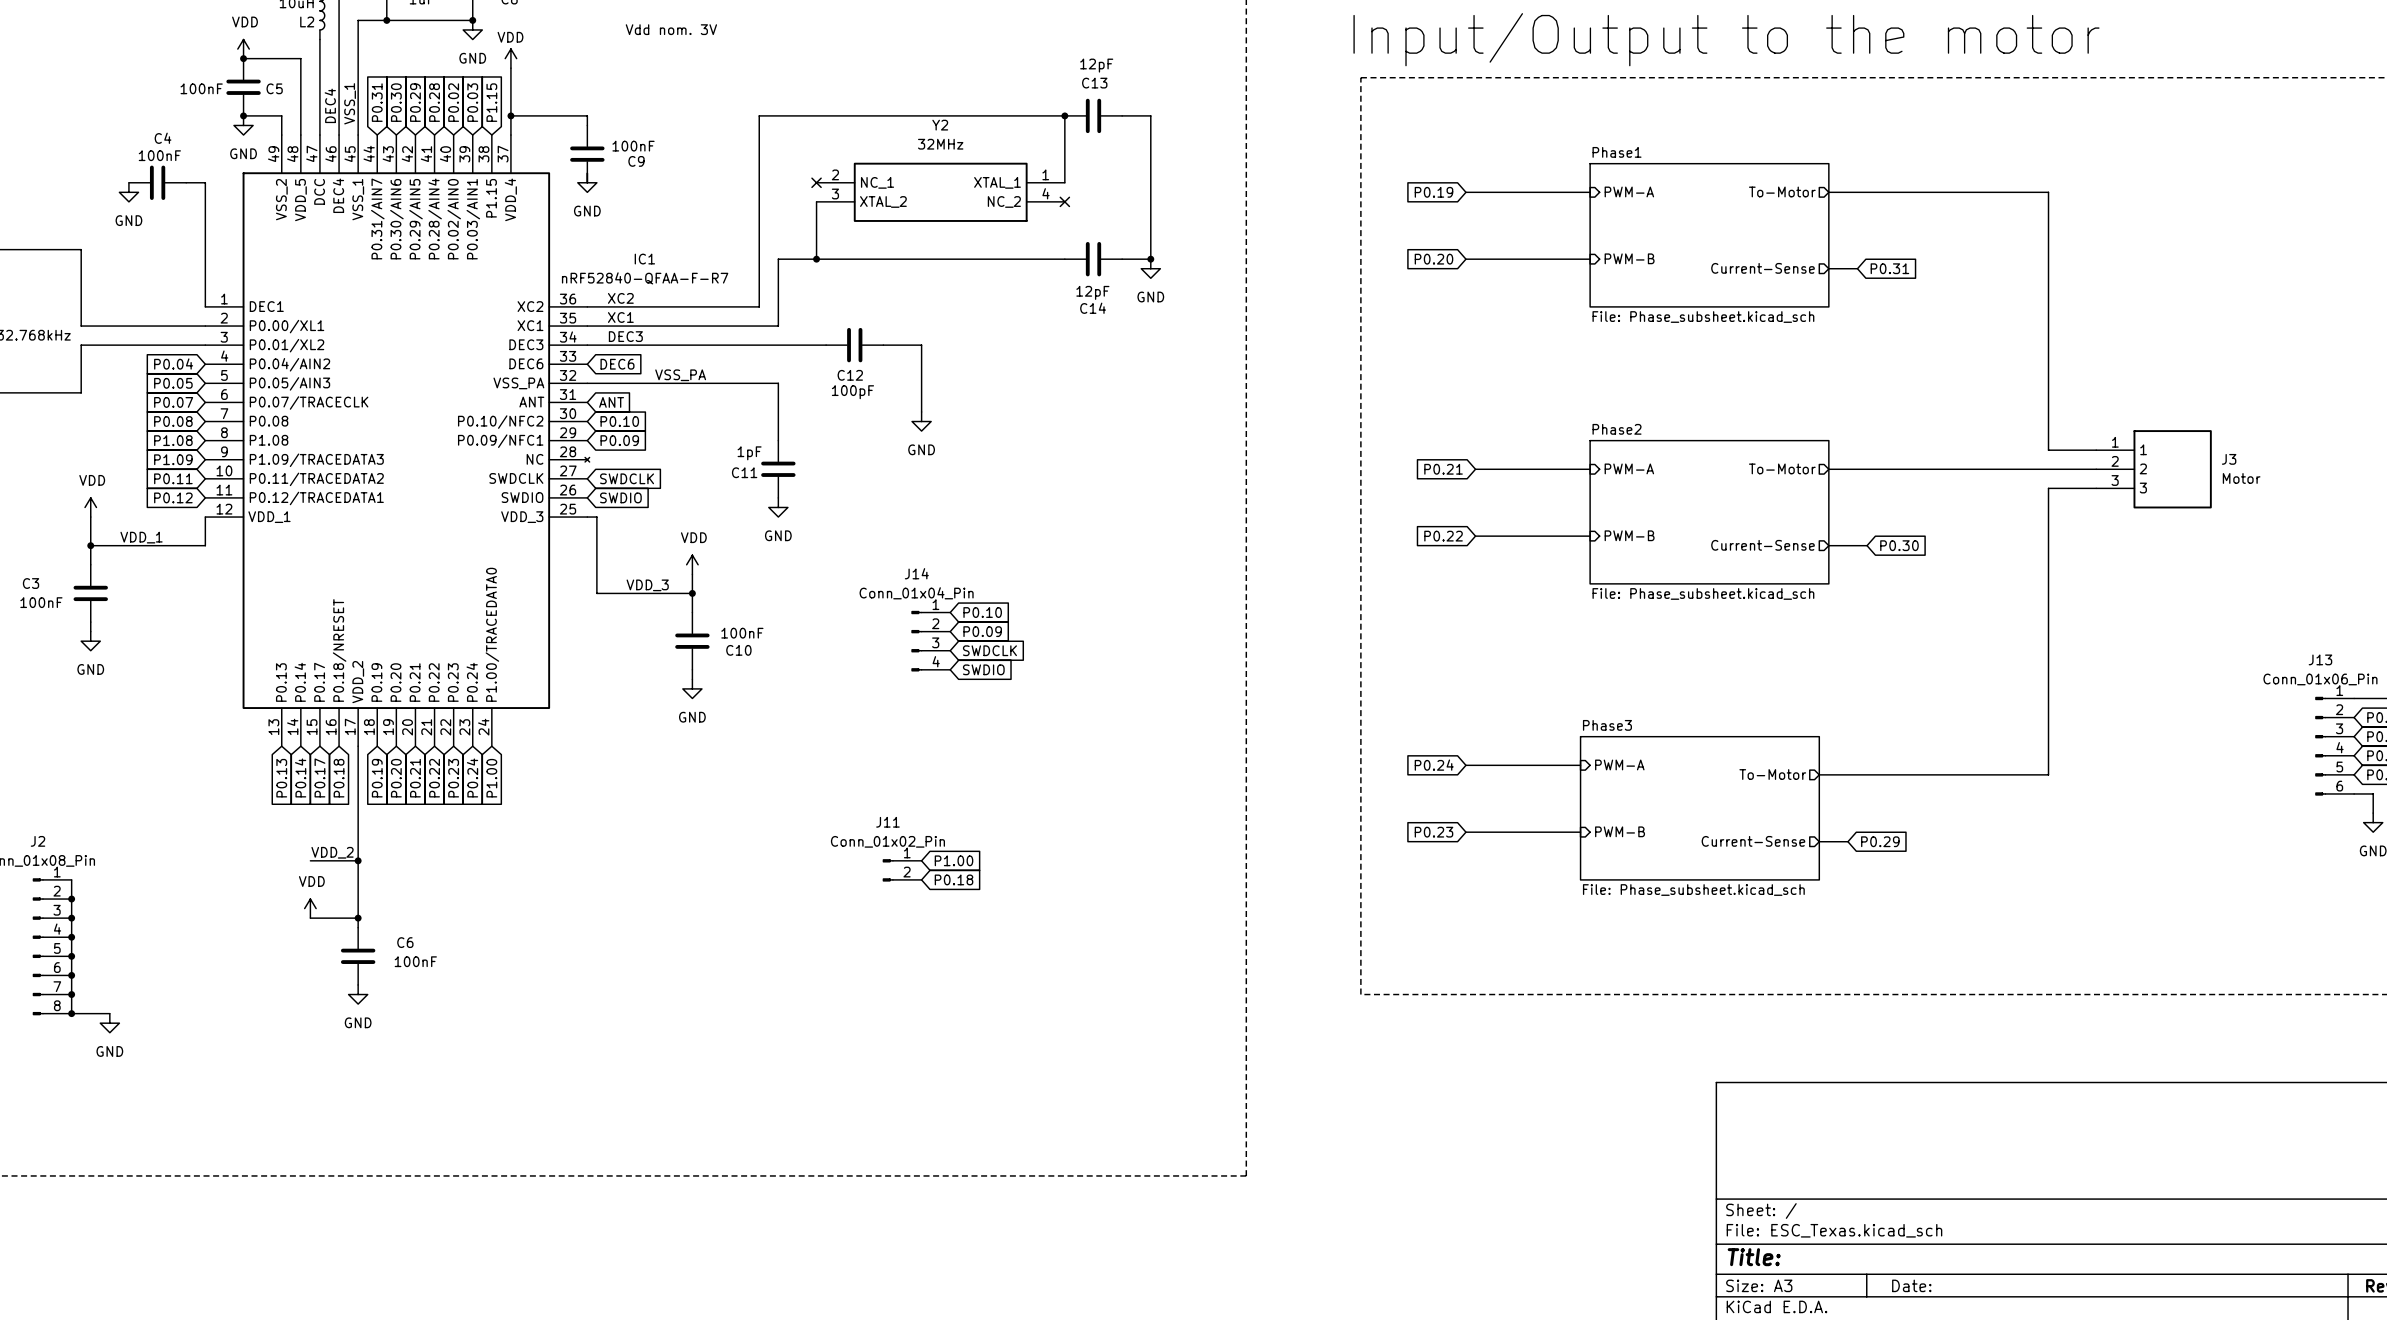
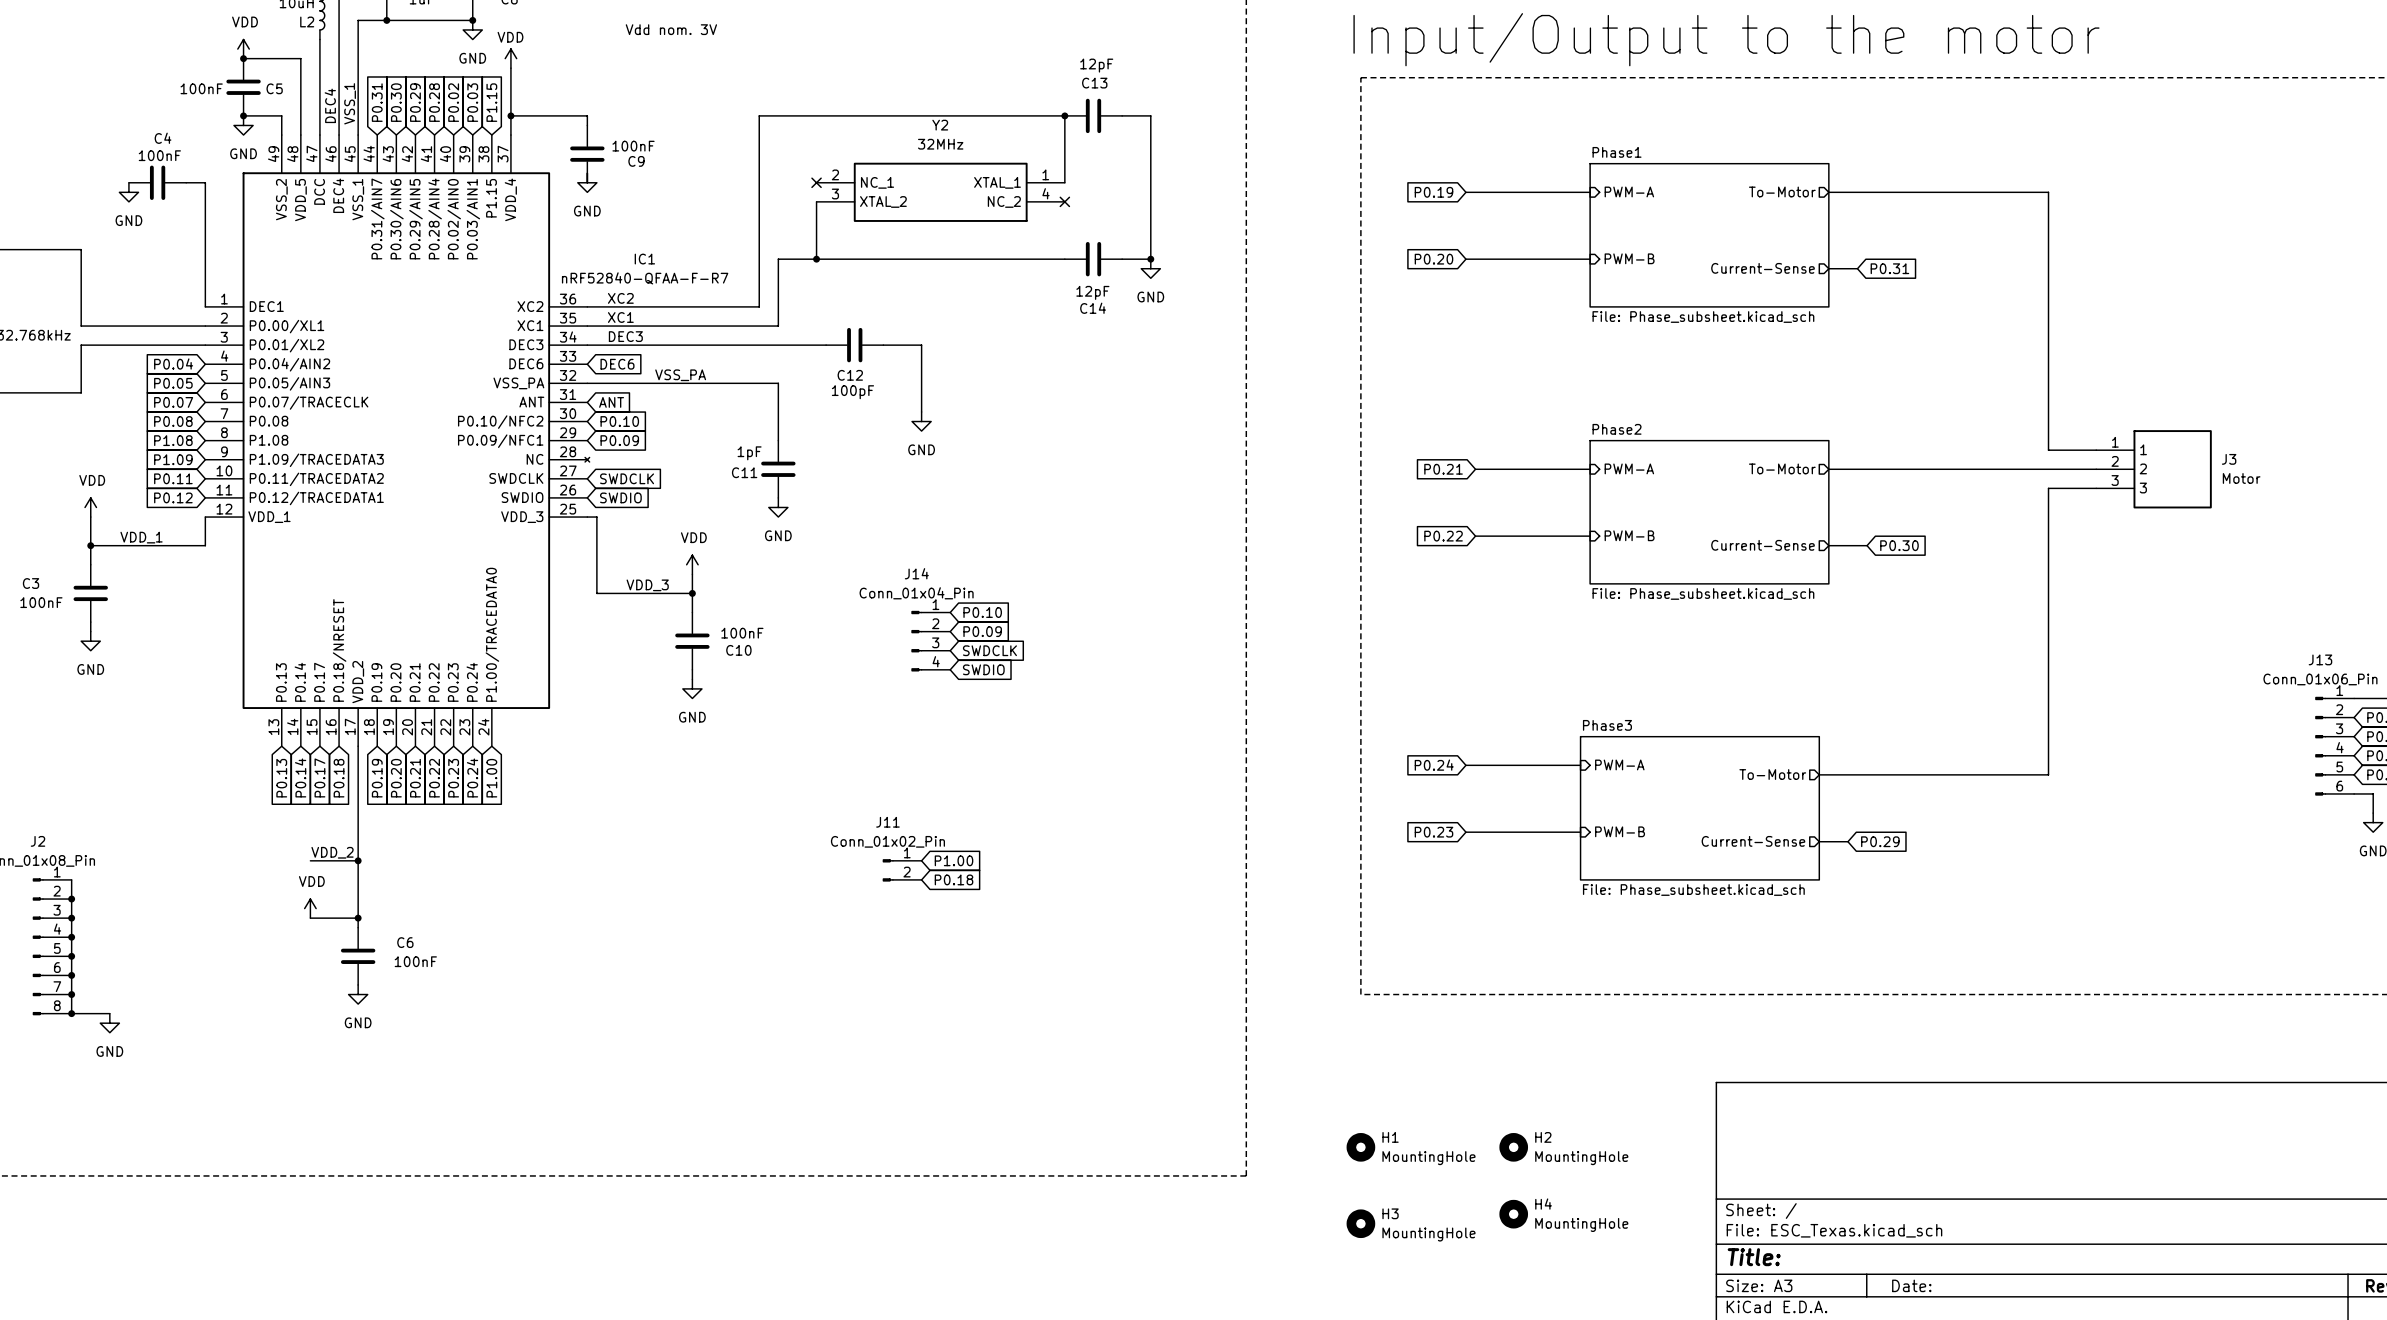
H1: none -> MountingHole (1360, 1147)
H2: none -> MountingHole (1513, 1147)
H4: none -> MountingHole (1513, 1214)
H3: none -> MountingHole (1360, 1223)

